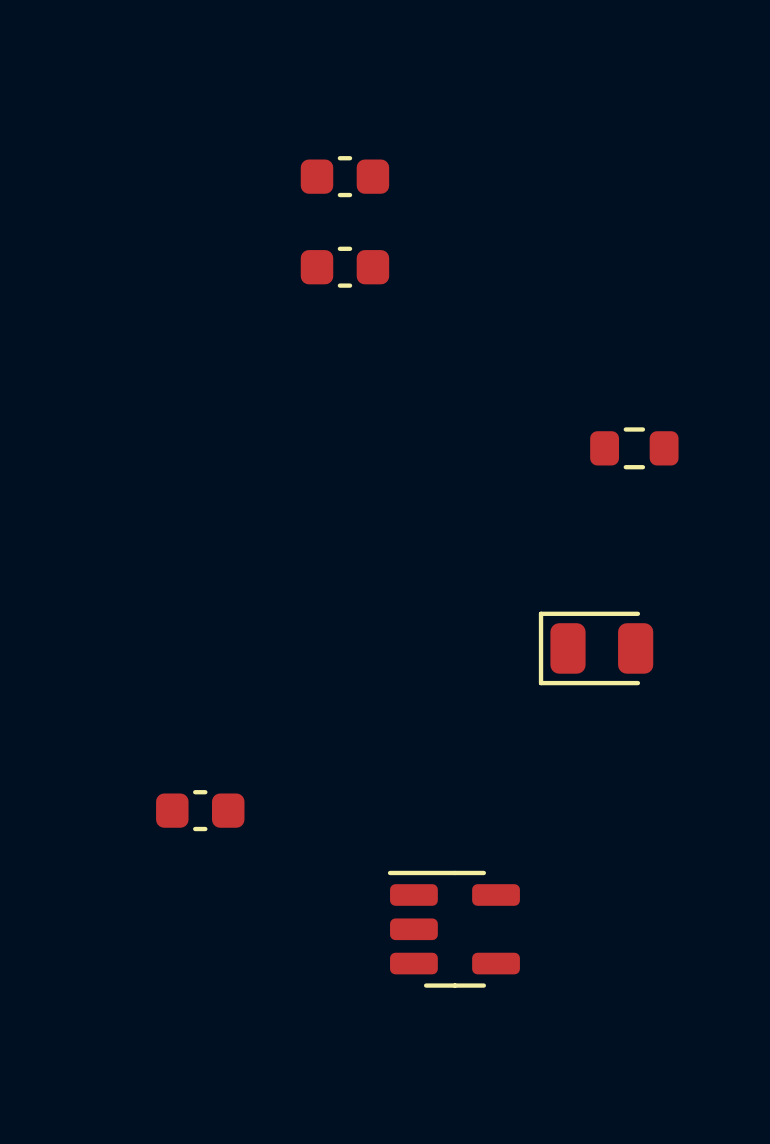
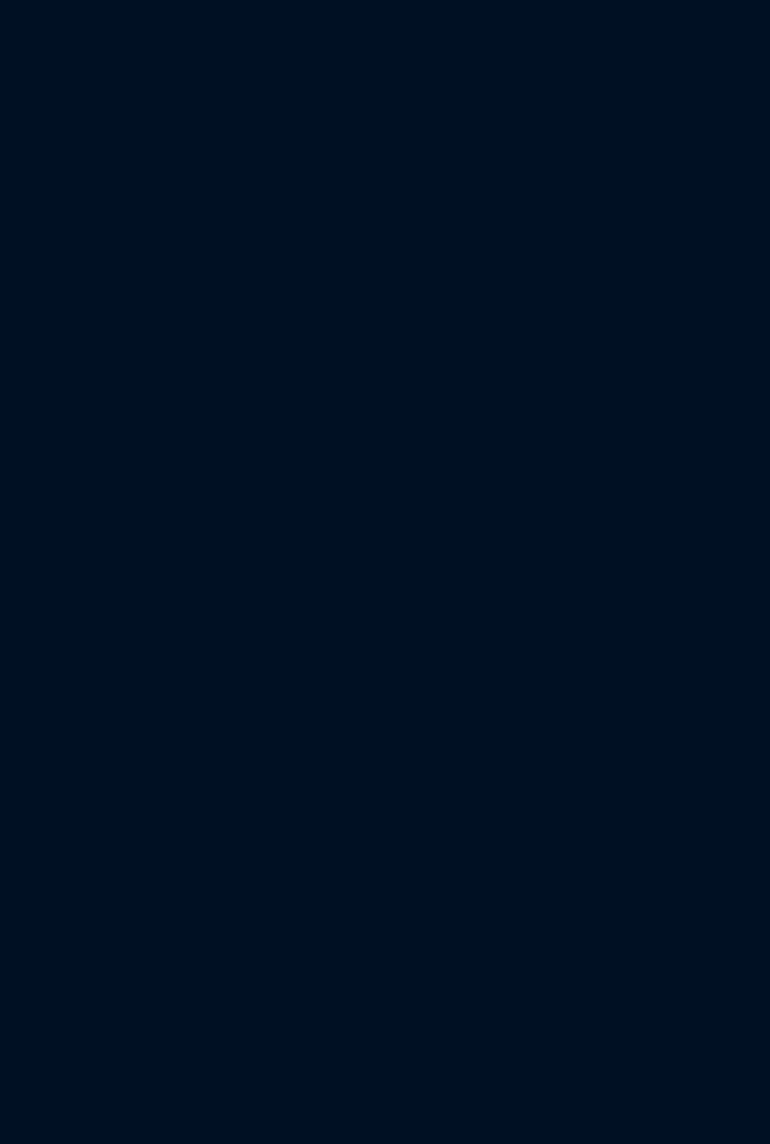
part: (344, 176) -> none
part: (344, 267) -> none
part: (634, 448) -> none
part: (596, 648) -> none
part: (200, 810) -> none
part: (453, 929) -> none

